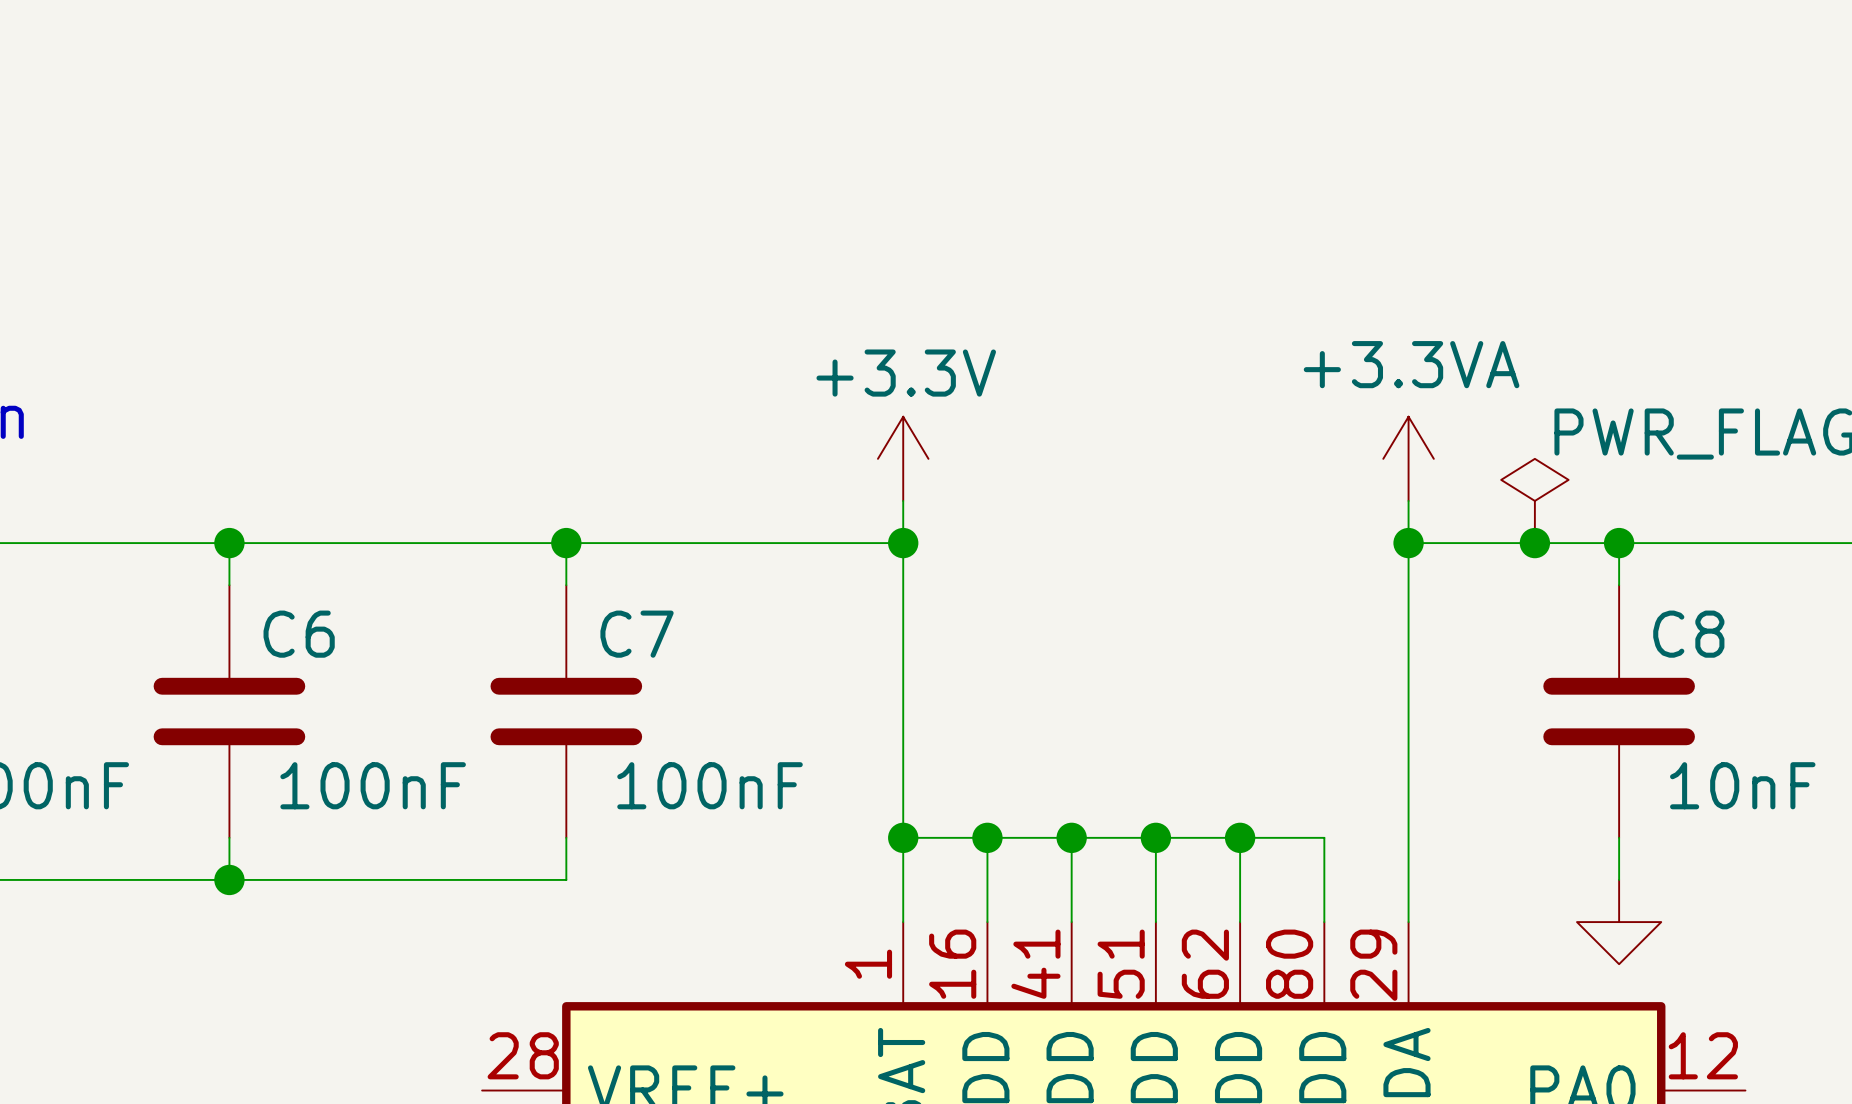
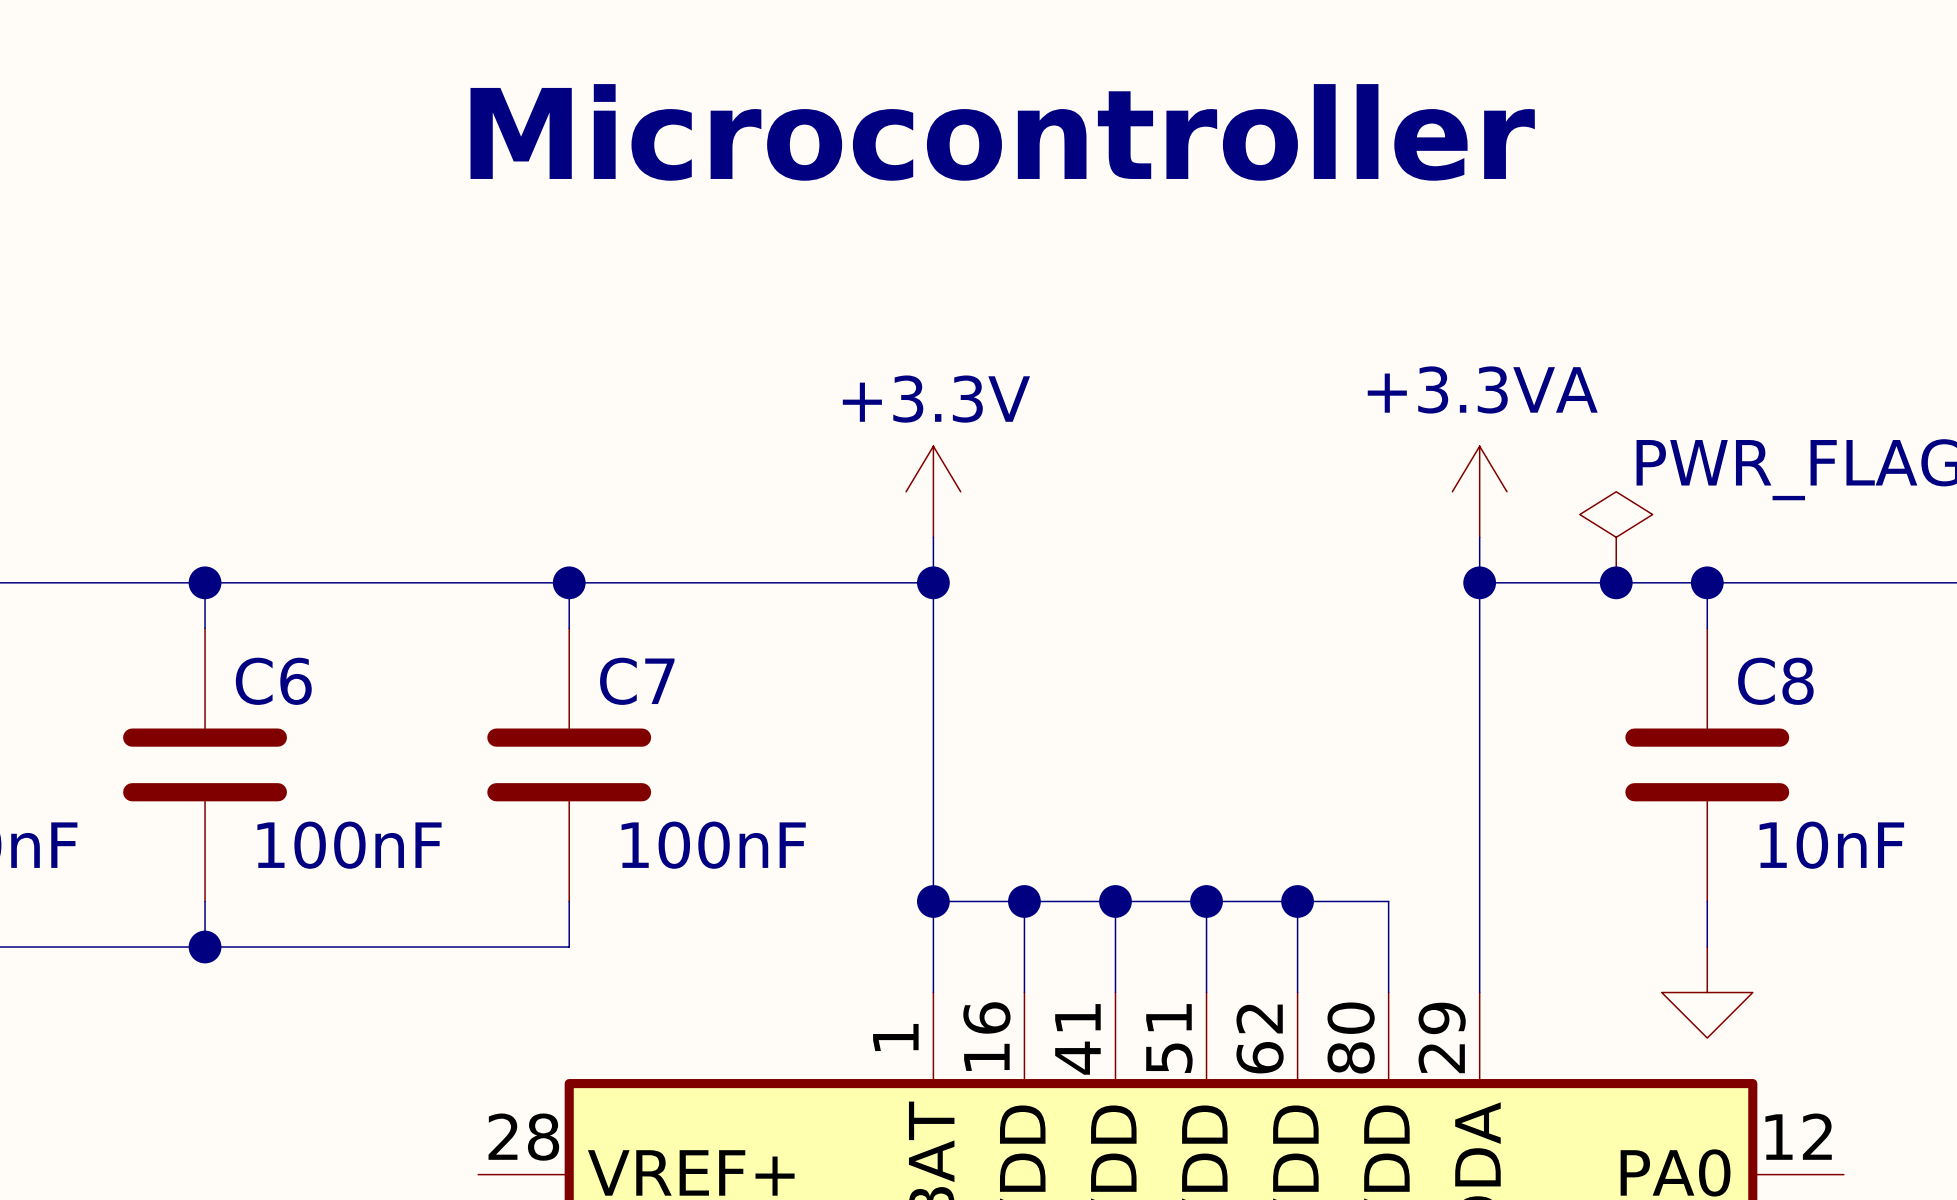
text: none -> Microcontroller (1002, 132)

